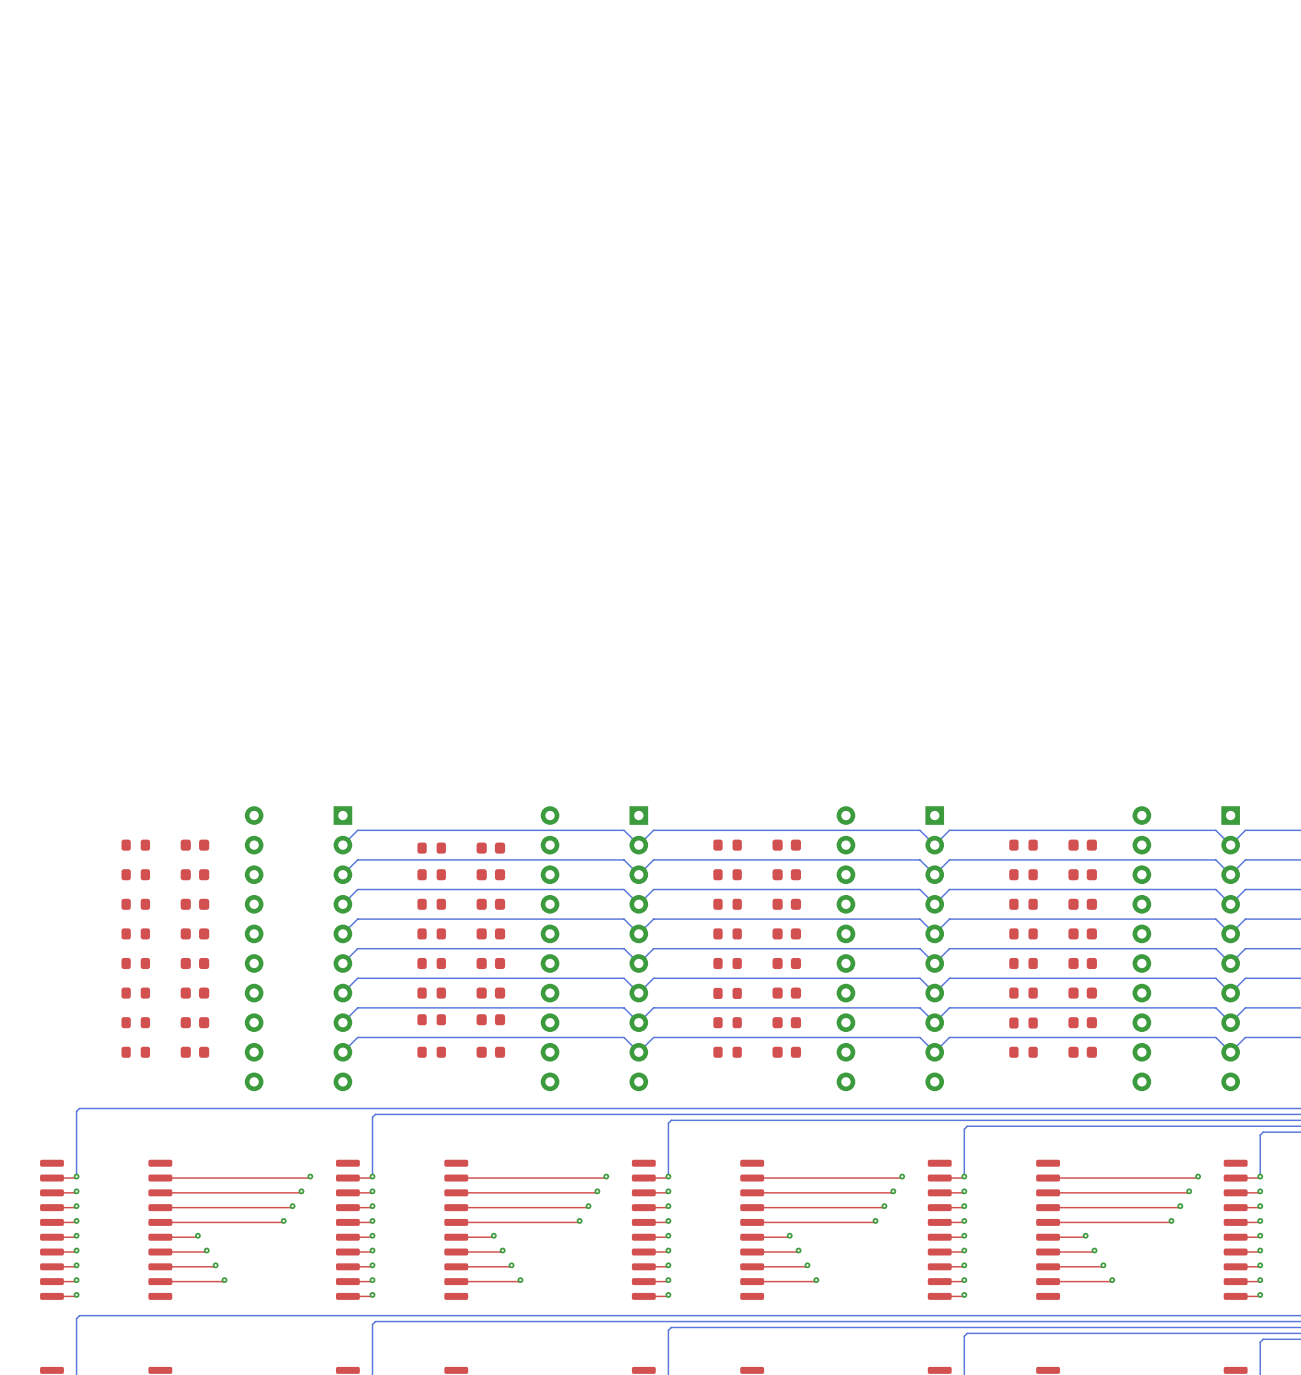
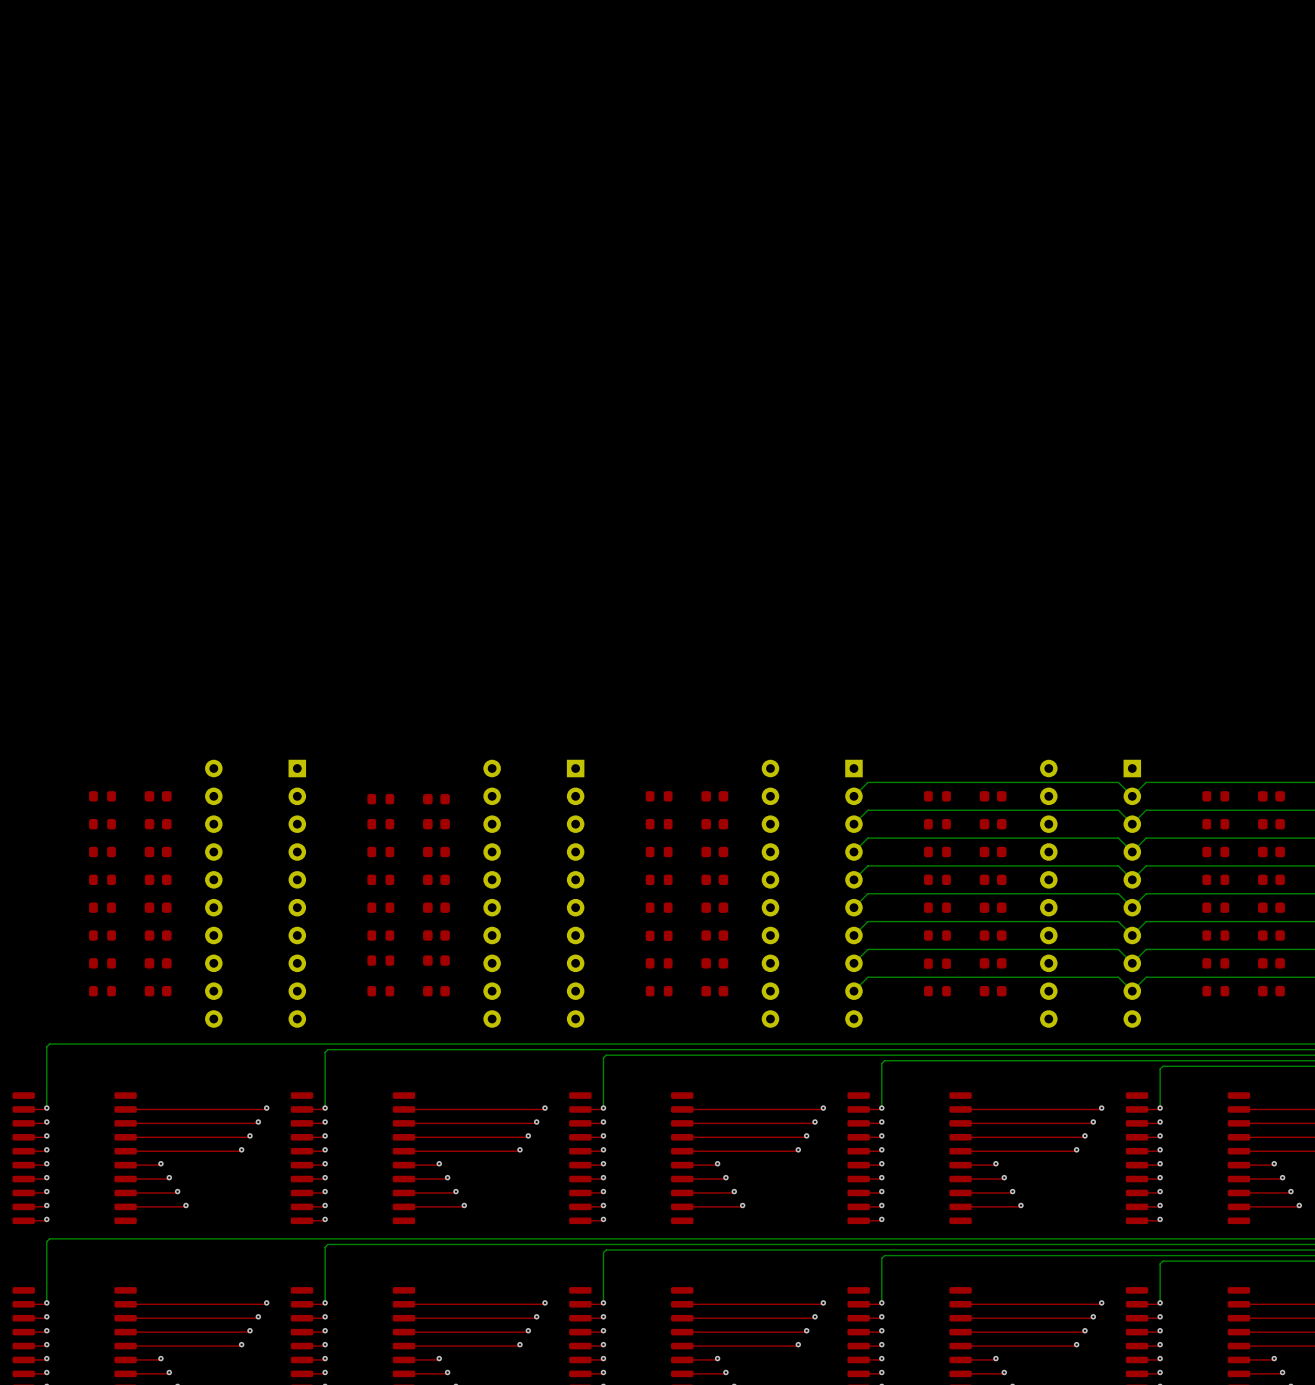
bottom track: (934, 845) (919, 830) (653, 830) (638, 845) (624, 830) (357, 830) (342, 845) -> none
bottom track: (934, 874) (919, 859) (653, 859) (638, 874) (624, 859) (357, 859) (342, 874) -> none
bottom track: (934, 904) (919, 889) (653, 889) (638, 904) (624, 889) (357, 889) (342, 904) -> none
bottom track: (934, 933) (919, 919) (653, 919) (638, 933) (624, 919) (357, 919) (342, 933) -> none
bottom track: (934, 963) (919, 948) (653, 948) (638, 963) (624, 948) (357, 948) (342, 963) -> none
bottom track: (934, 993) (919, 978) (653, 978) (638, 993) (624, 978) (357, 978) (342, 993) -> none
bottom track: (934, 1022) (919, 1007) (653, 1007) (638, 1022) (624, 1007) (357, 1007) (342, 1022) -> none
bottom track: (934, 1052) (919, 1037) (653, 1037) (638, 1052) (624, 1037) (357, 1037) (342, 1052) -> none

